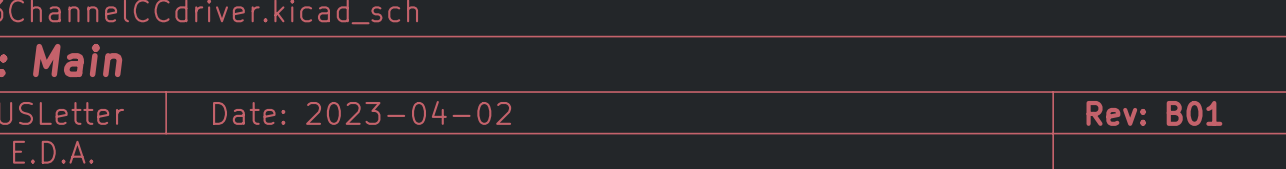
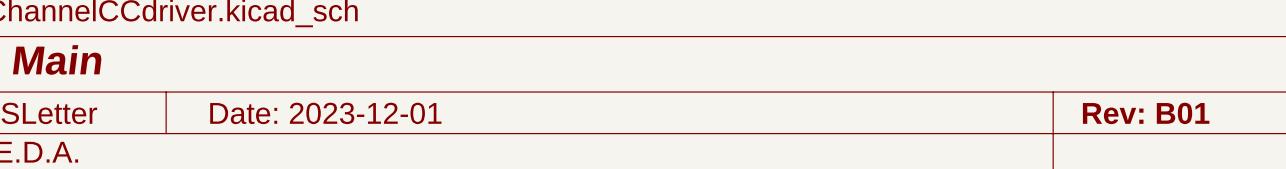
title block: Date: 2023-04-02 (362, 112) -> Date: 2023-12-01 (325, 113)

